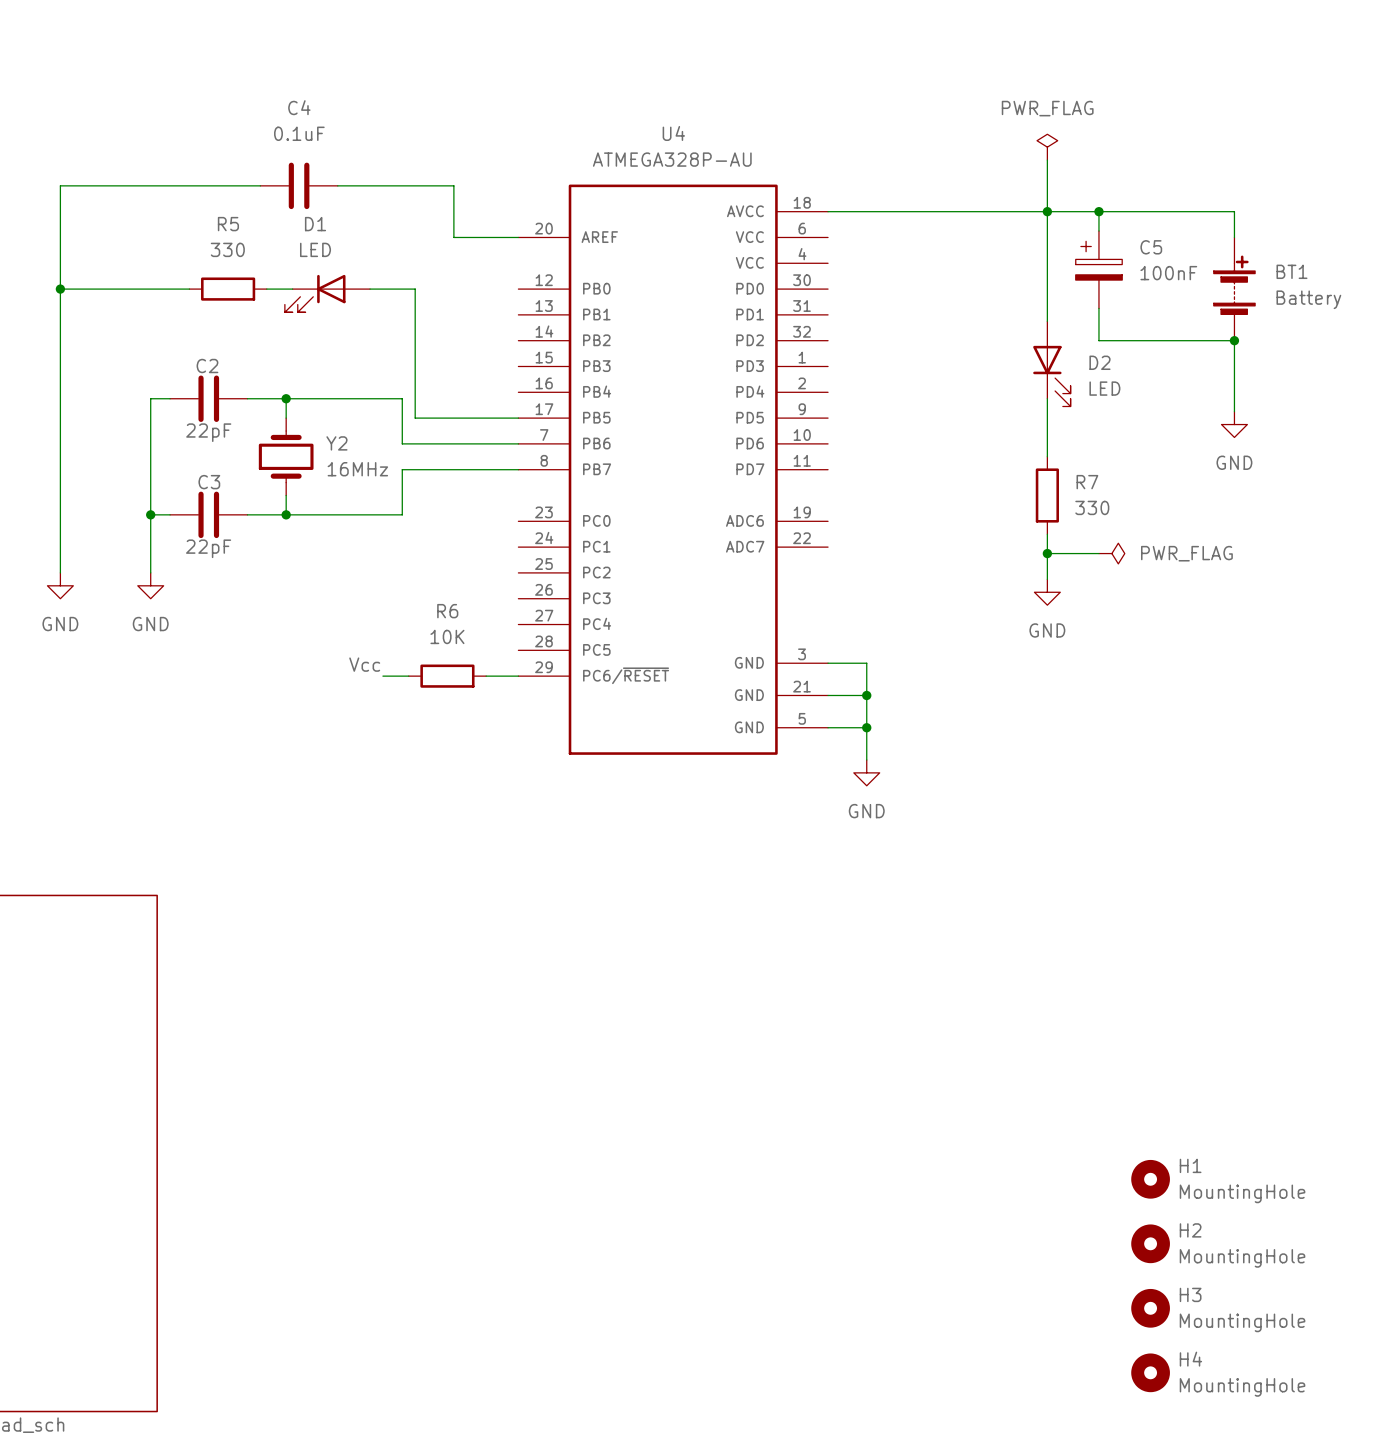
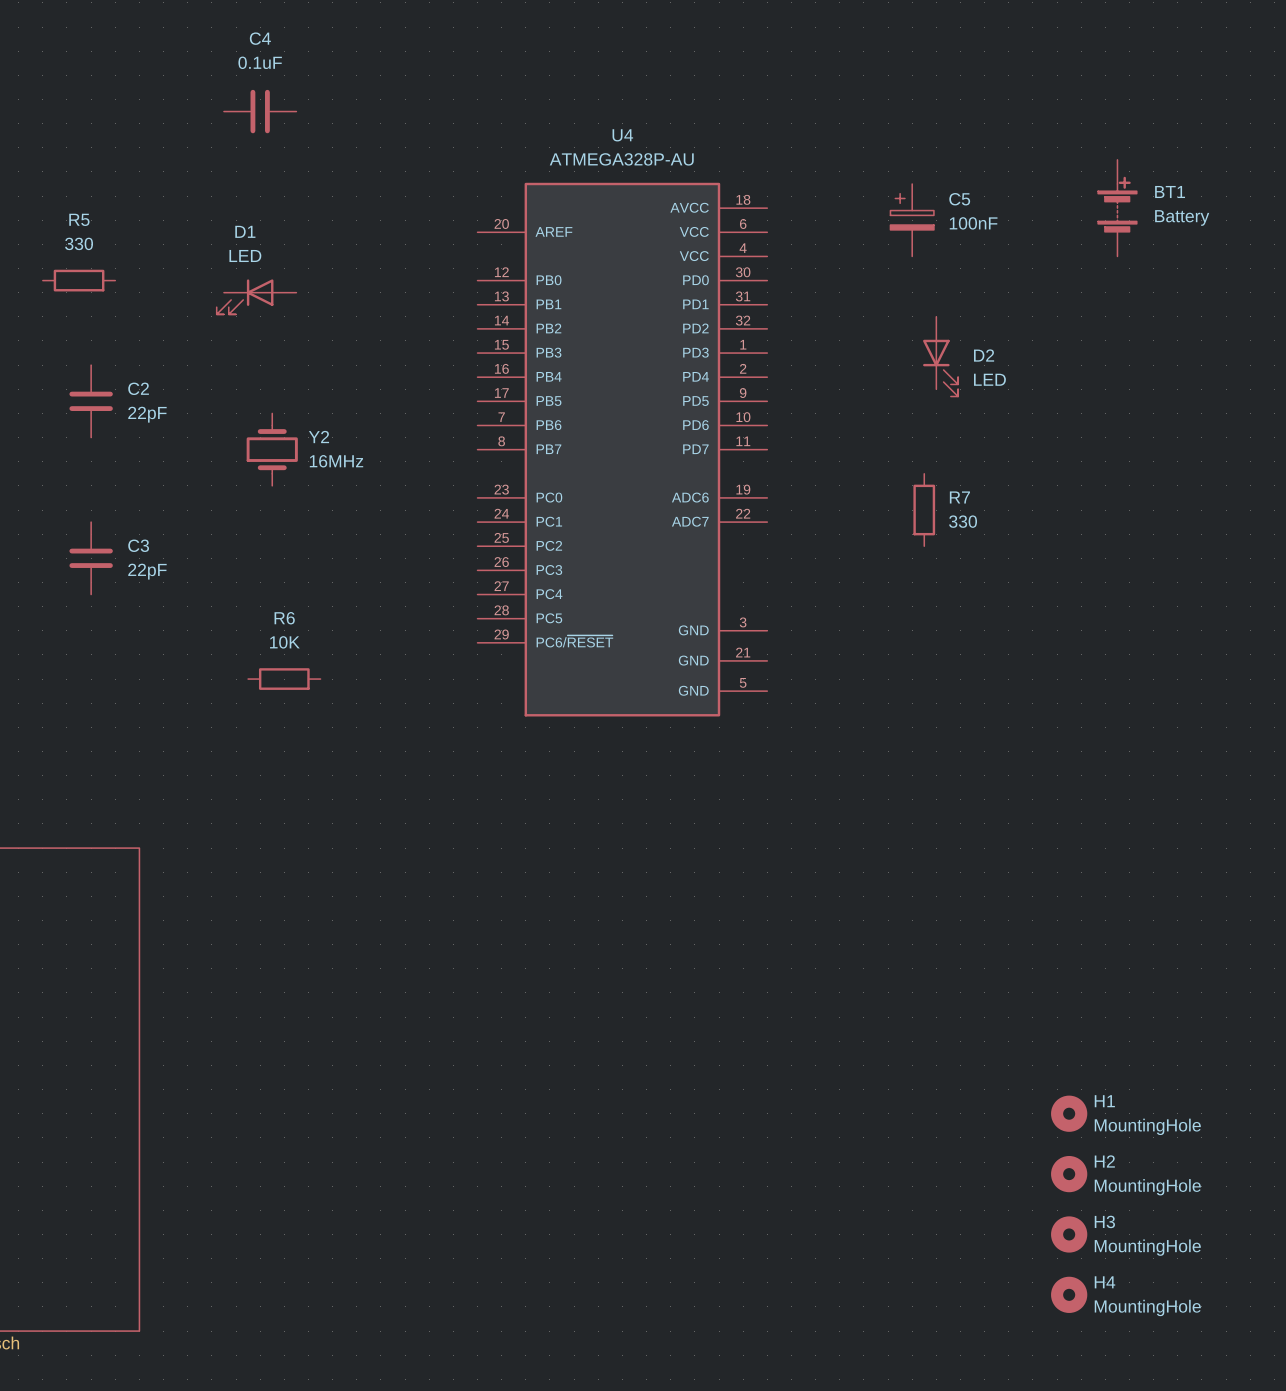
power symbol: PWR_FLAG (1047, 147) -> none
wire: (1047, 160) (1047, 321) -> none
wire: (260, 185) (60, 185) (60, 572) -> none
C4 position: (299, 185) -> (260, 111)
wire: (337, 185) (453, 185) (453, 237) (518, 237) -> none
wire: (828, 211) (1234, 211) (1234, 237) -> none
junction: (1047, 211) -> none
wire: (1098, 211) (1098, 231) -> none
junction: (1098, 211) -> none
C5 position: (1098, 269) -> (912, 220)
wire: (60, 289) (189, 289) -> none
junction: (60, 289) -> none
R5 position: (228, 289) -> (79, 280)
wire: (266, 289) (292, 289) -> none
wire: (370, 289) (415, 289) (415, 418) (518, 418) -> none
BT1 position: (1234, 289) -> (1117, 208)
D1 position: (327, 293) -> (256, 296)
wire: (1098, 308) (1098, 340) (1234, 340) (1234, 411) -> none
junction: (1234, 340) -> none
D2 position: (1051, 363) -> (940, 356)
C2 name position: C2 (207, 366) -> C2 (138, 388)
wire: (170, 398) (150, 398) (150, 572) -> none
C2 rotation: 0° (208, 398) -> 90° clockwise (91, 401)
C2 position: (208, 398) -> (91, 401)
wire: (247, 398) (402, 398) (402, 443) (518, 443) -> none
wire: (286, 398) (286, 418) -> none
junction: (286, 398) -> none
wire: (1047, 398) (1047, 456) -> none
power symbol: GND (1234, 424) -> none
C2 value position: 22pF (208, 432) -> 22pF (147, 414)
Y2 position: (286, 456) -> (272, 449)
wire: (518, 469) (402, 469) (402, 514) (247, 514) -> none
C3 name position: C3 (209, 482) -> C3 (138, 545)
wire: (286, 495) (286, 514) -> none
R7 position: (1047, 495) -> (924, 510)
wire: (150, 514) (170, 514) -> none
junction: (150, 514) -> none
C3 rotation: 0° (208, 514) -> 90° clockwise (91, 558)
C3 position: (208, 514) -> (91, 558)
junction: (286, 514) -> none
wire: (1047, 534) (1047, 579) -> none
C3 value position: 22pF (208, 548) -> 22pF (147, 571)
wire: (1047, 553) (1098, 553) -> none
junction: (1047, 553) -> none
power symbol: PWR_FLAG (1111, 553) -> none
power symbol: GND (60, 585) -> none
power symbol: GND (150, 585) -> none
power symbol: GND (1047, 592) -> none
wire: (828, 663) (866, 663) (866, 759) -> none
label: Vcc (364, 664) -> none
wire: (382, 676) (408, 676) -> none
R6 position: (447, 676) -> (284, 679)
wire: (486, 676) (518, 676) -> none
wire: (828, 695) (866, 695) -> none
junction: (866, 695) -> none
wire: (828, 727) (866, 727) -> none
junction: (866, 727) -> none
power symbol: GND (866, 772) -> none

